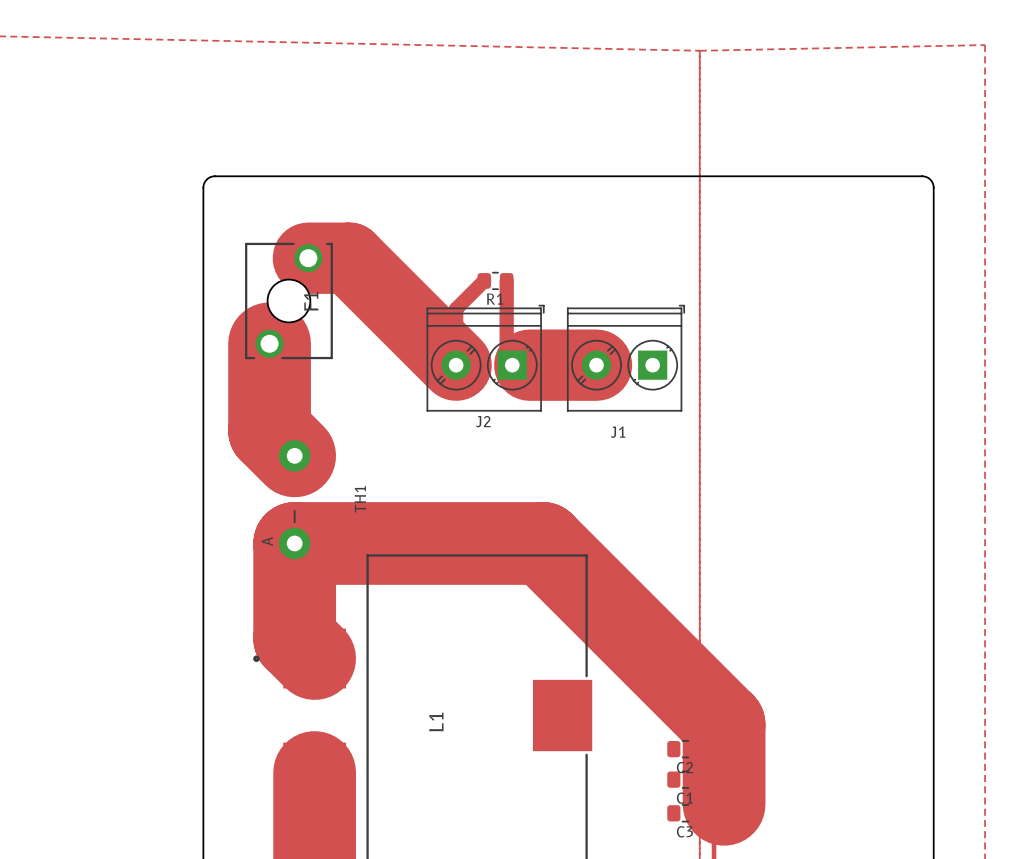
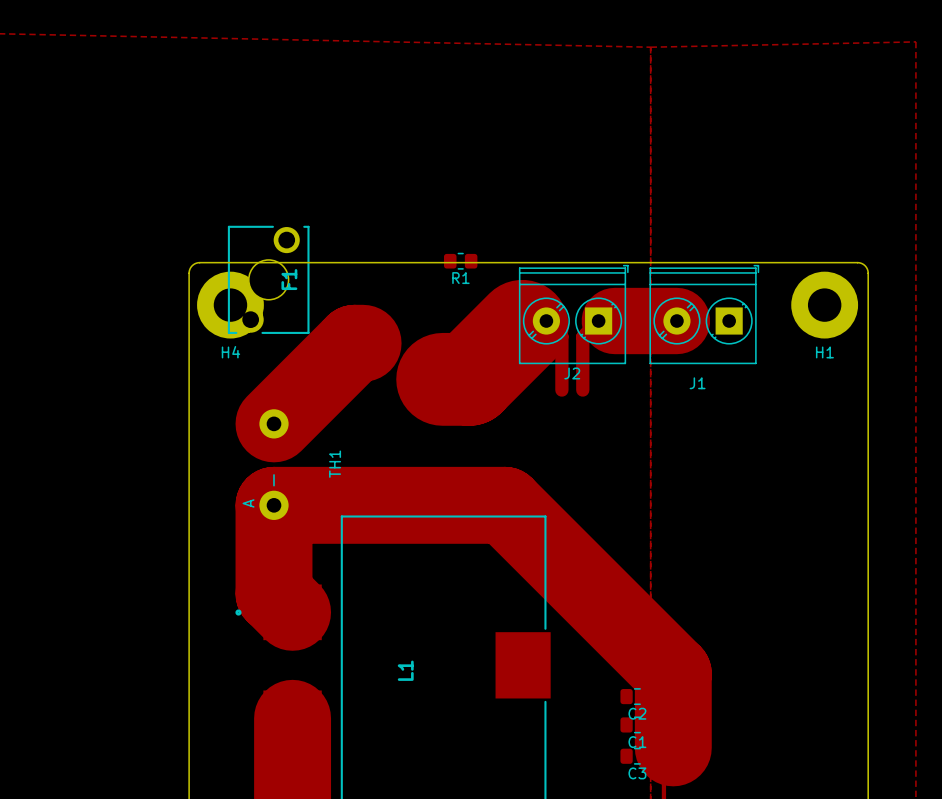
track: (308, 258) (349, 258) (456, 365) (456, 309) (484, 280) -> none
track: (506, 280) (506, 359) -> none
board edge: (203, 293) (203, 186) (207, 178) (214, 176) (923, 176) (930, 179) (933, 186) (933, 293) -> (189, 273) (192, 265) (199, 262) (857, 262) (865, 265) (868, 273)
H4: none -> (230, 305)
H1: none -> (824, 305)
track: (269, 343) (269, 430) (294, 455) -> (363, 343) (354, 343) (274, 423)
track: none -> (546, 321) (561, 336) (561, 390)
track: none -> (598, 321) (582, 336) (582, 390)
track: none -> (522, 326) (469, 379) (442, 379)
J2 position: (485, 358) -> (573, 314)
J1 position: (625, 358) -> (704, 314)
track: (529, 365) (596, 365) -> (614, 321) (676, 321)

